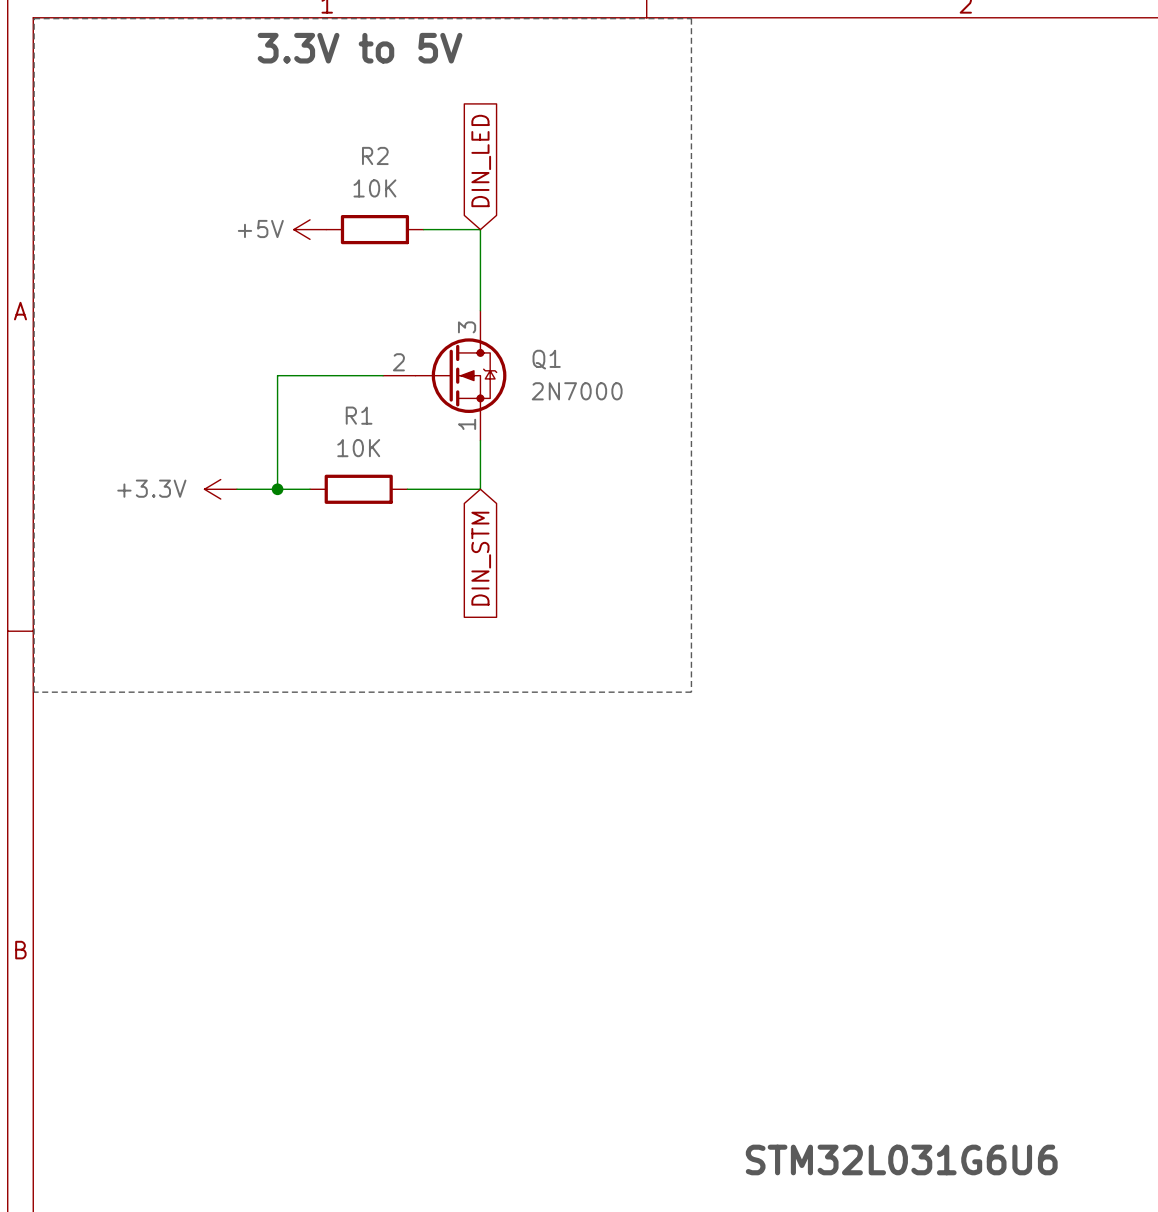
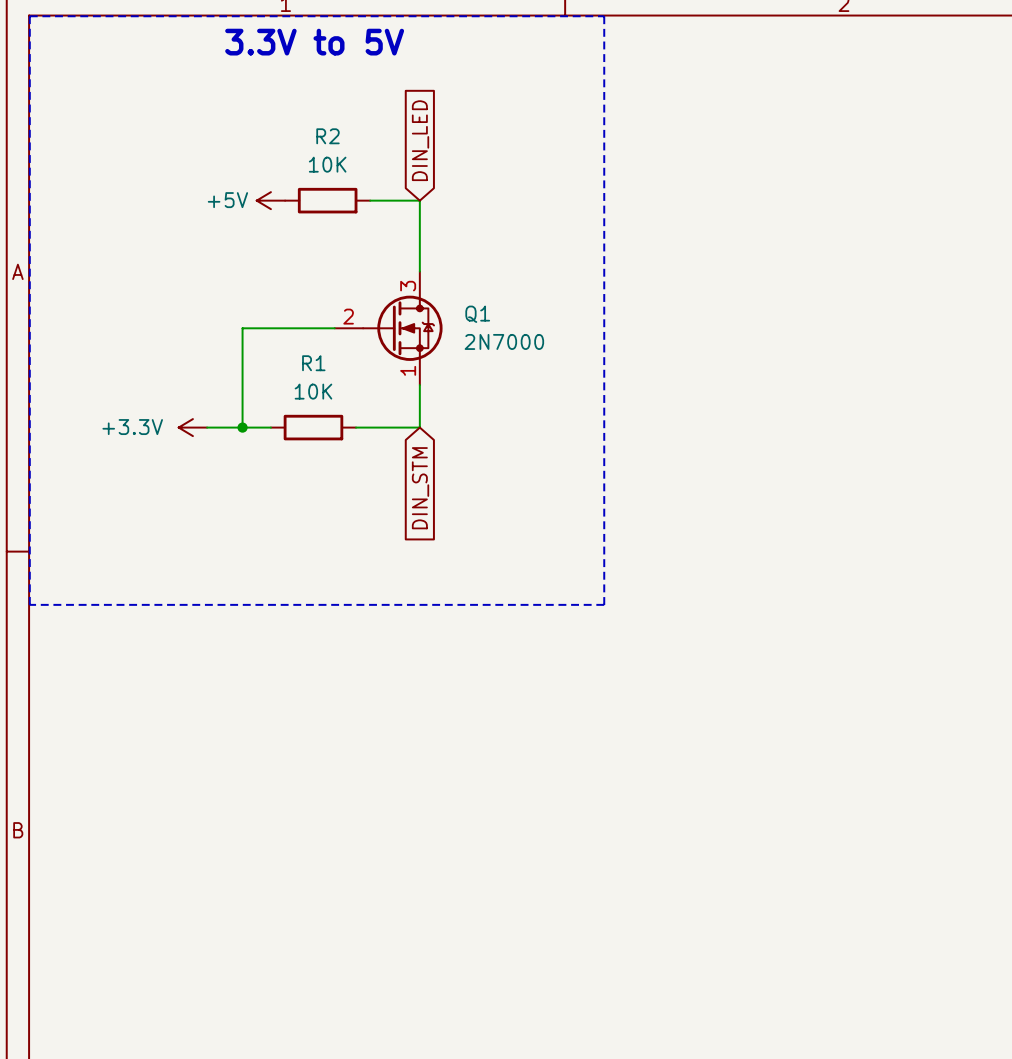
text: STM32L031G6U6 (901, 1159) -> none

